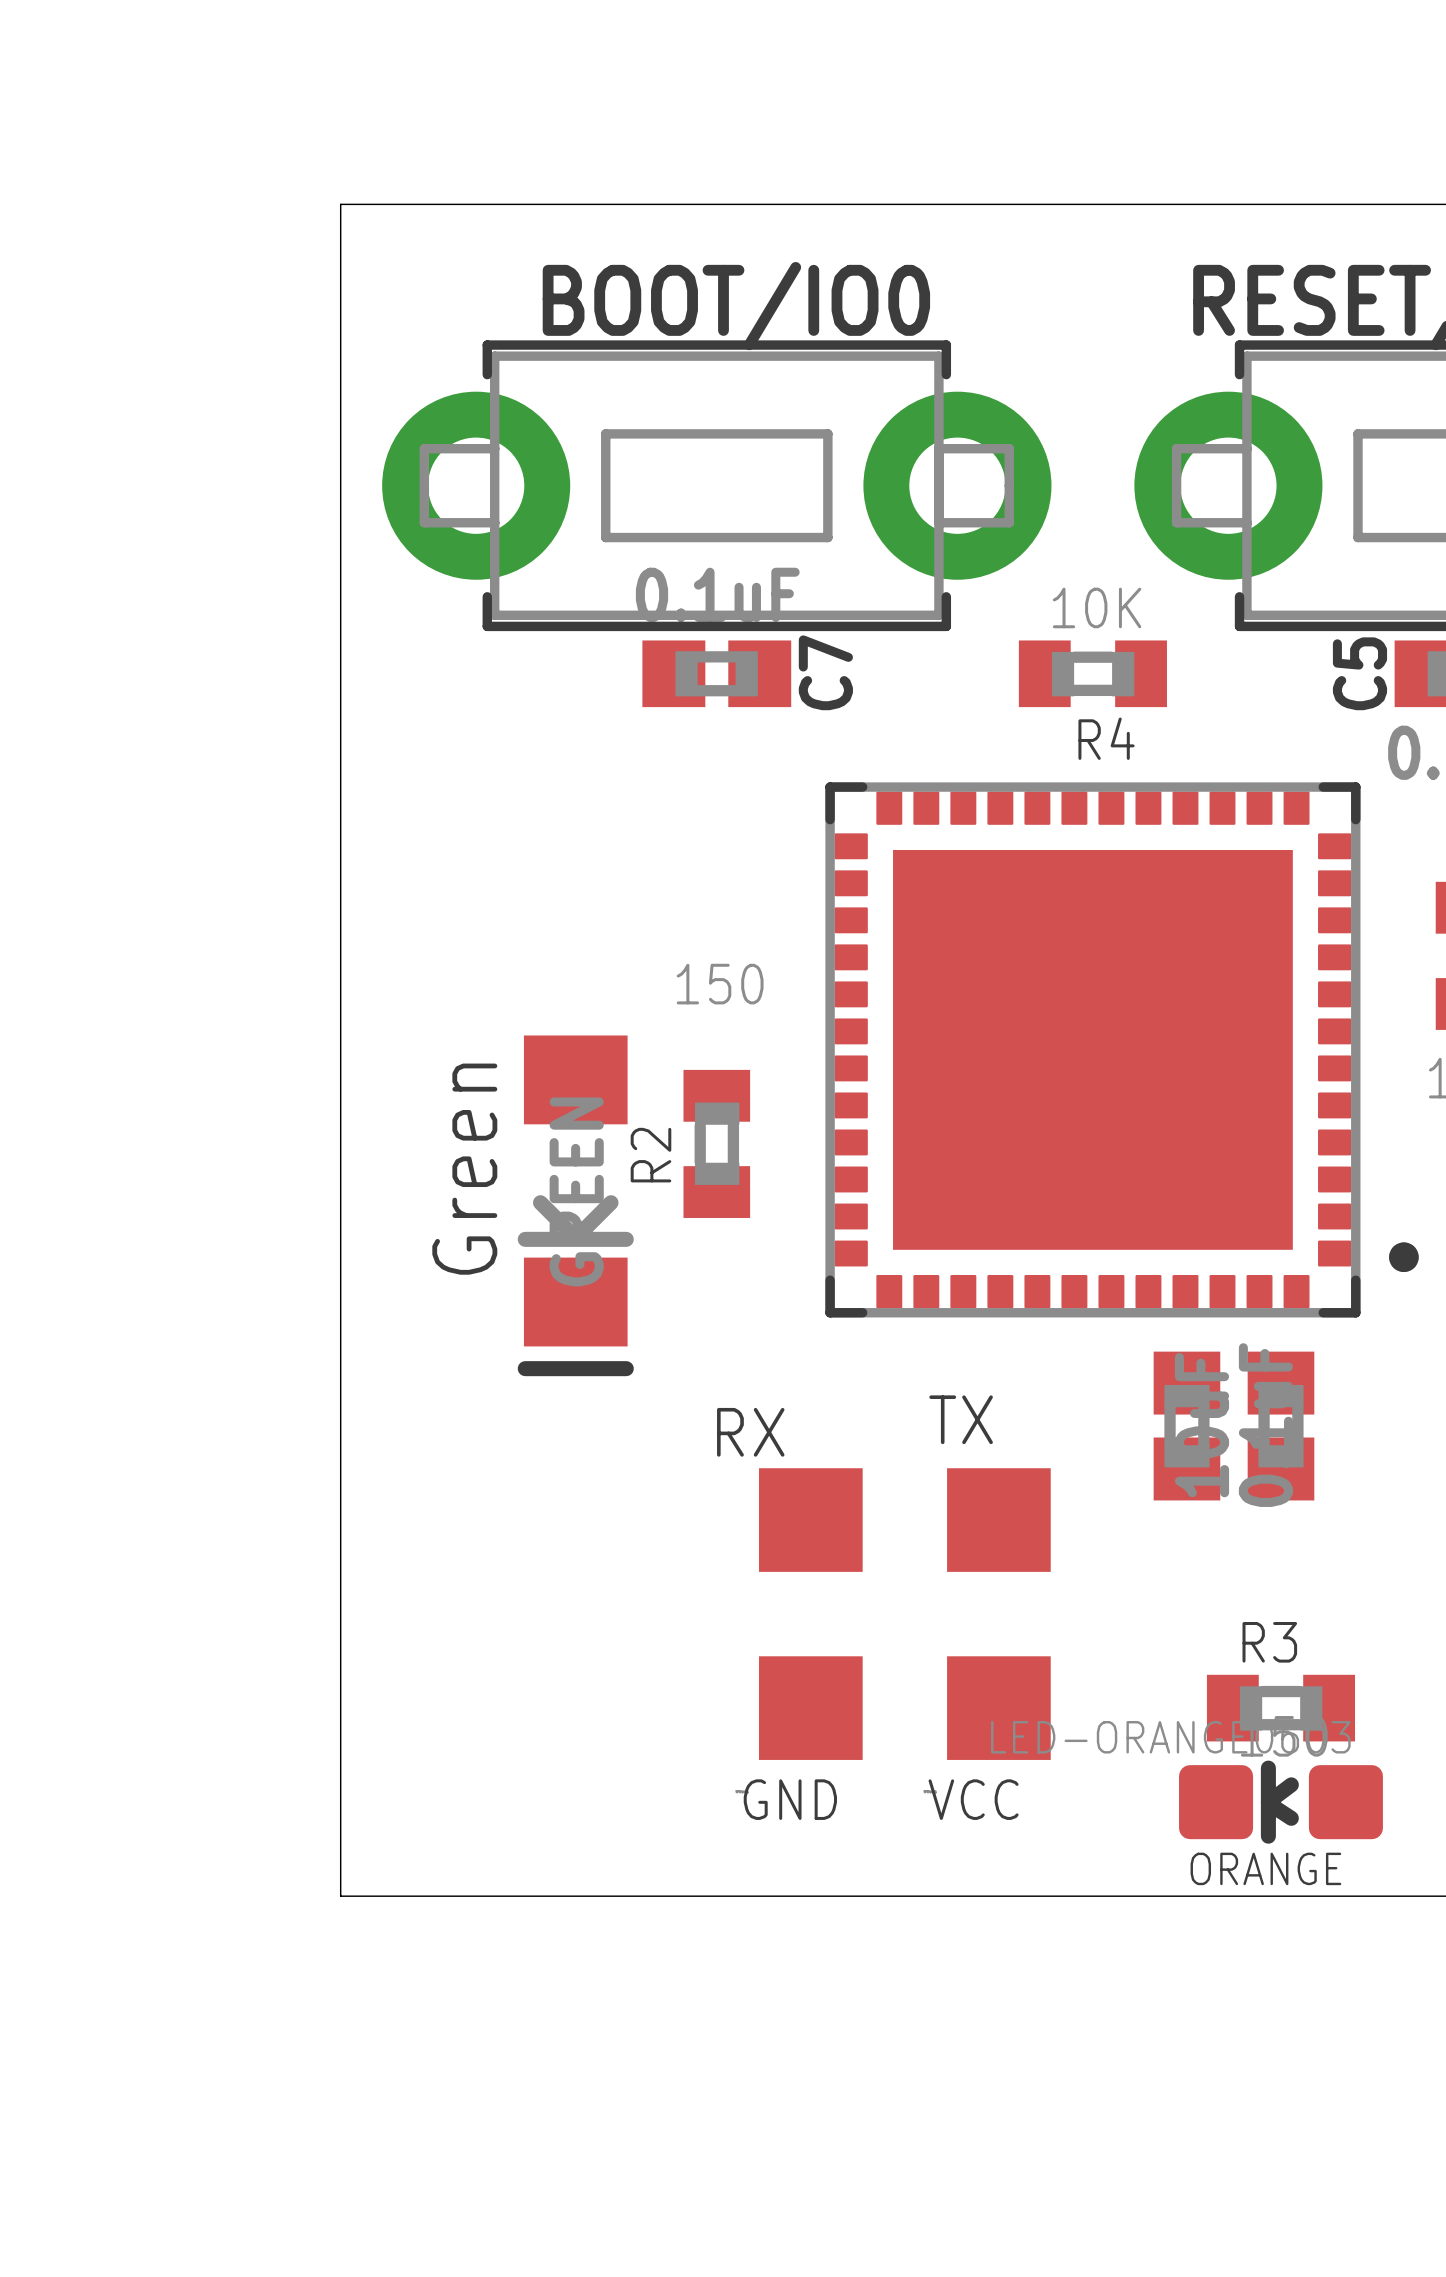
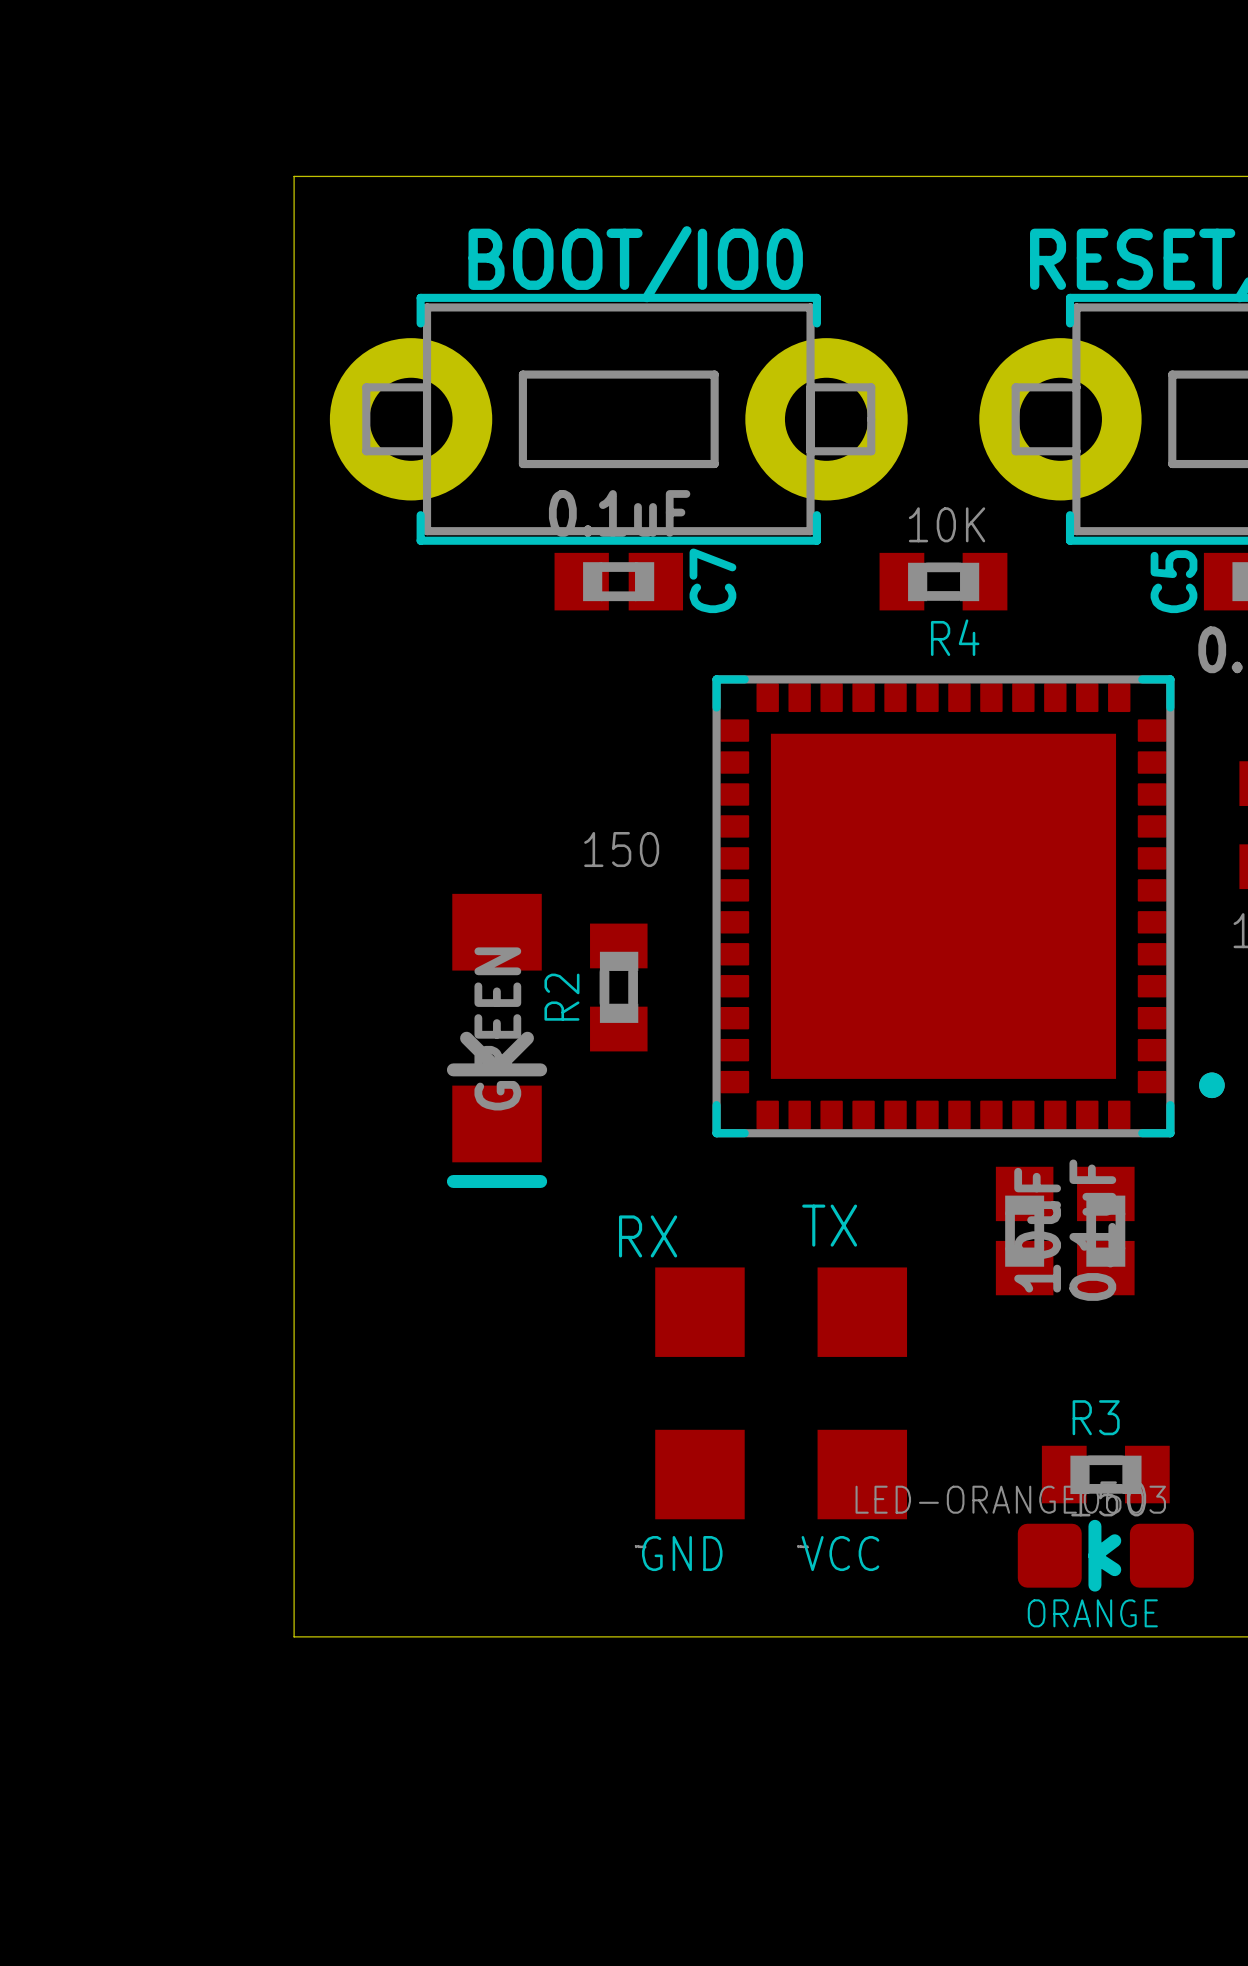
text: Green (464, 1169) -> none

